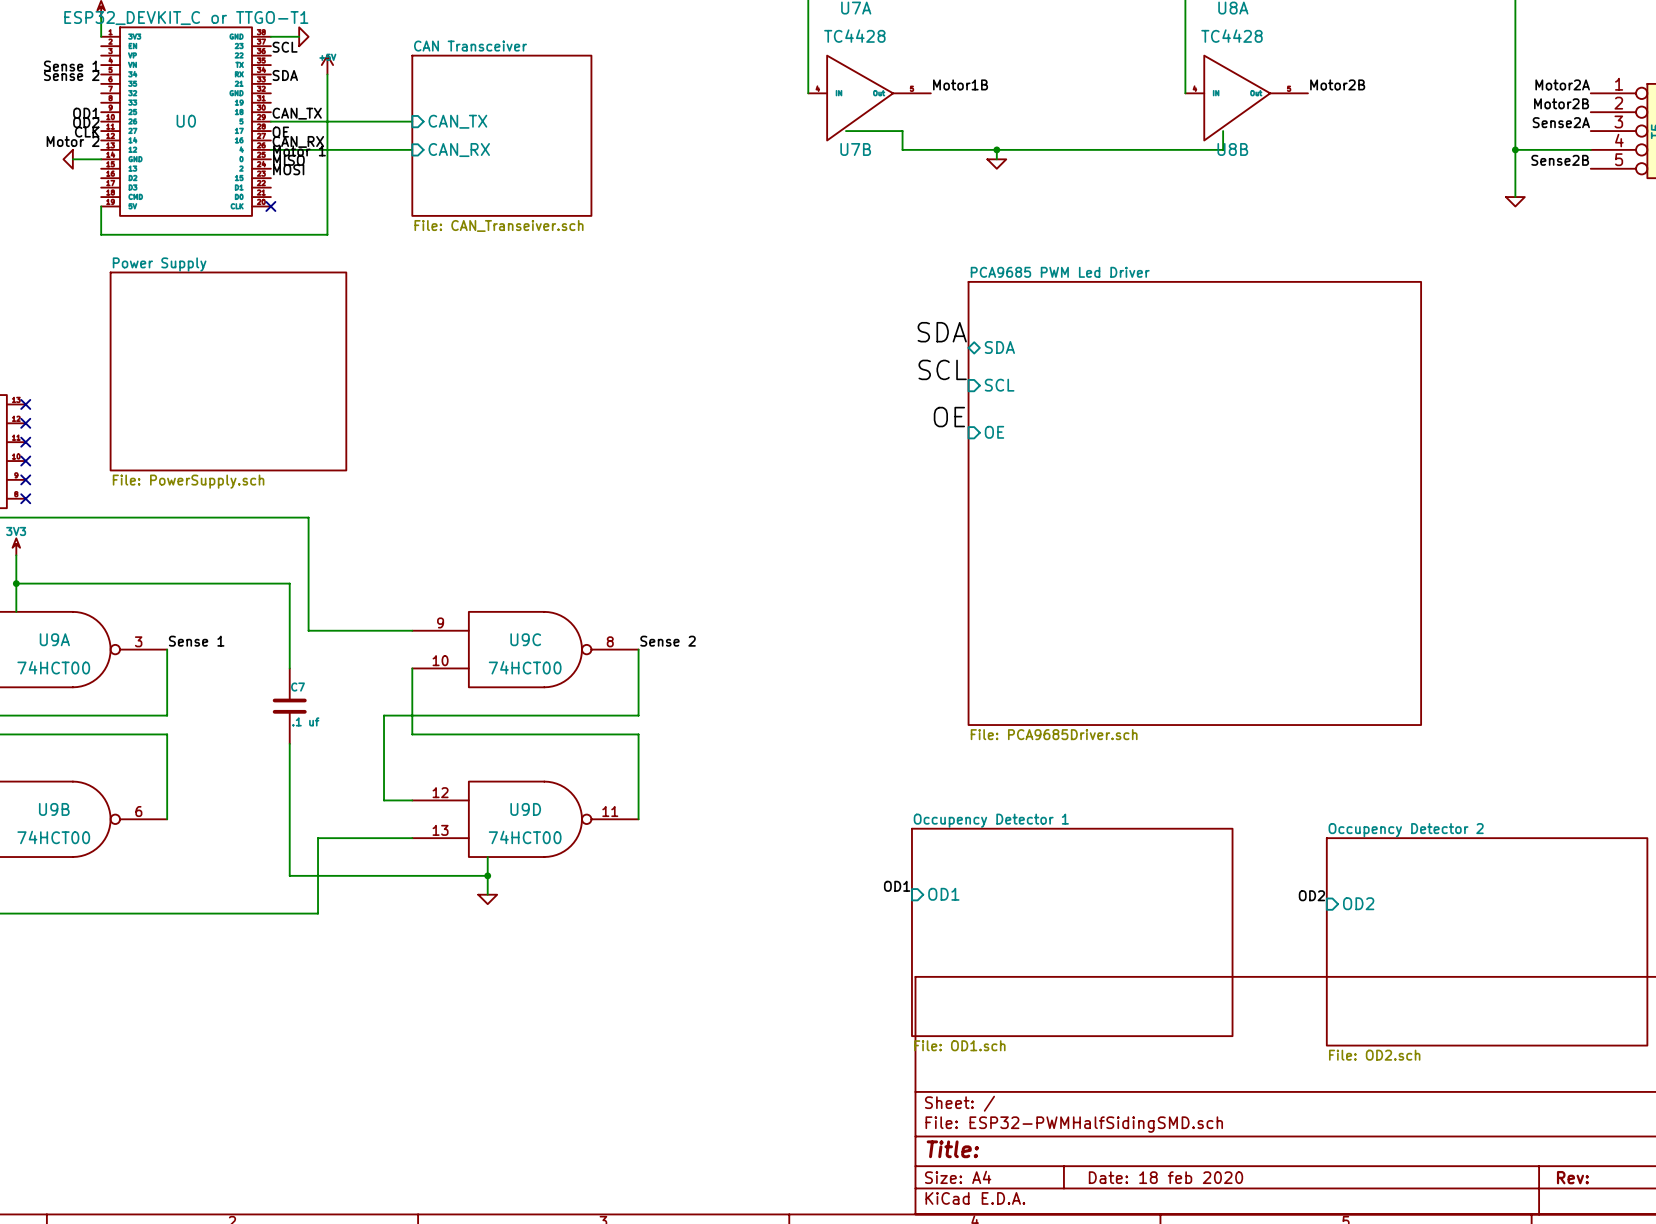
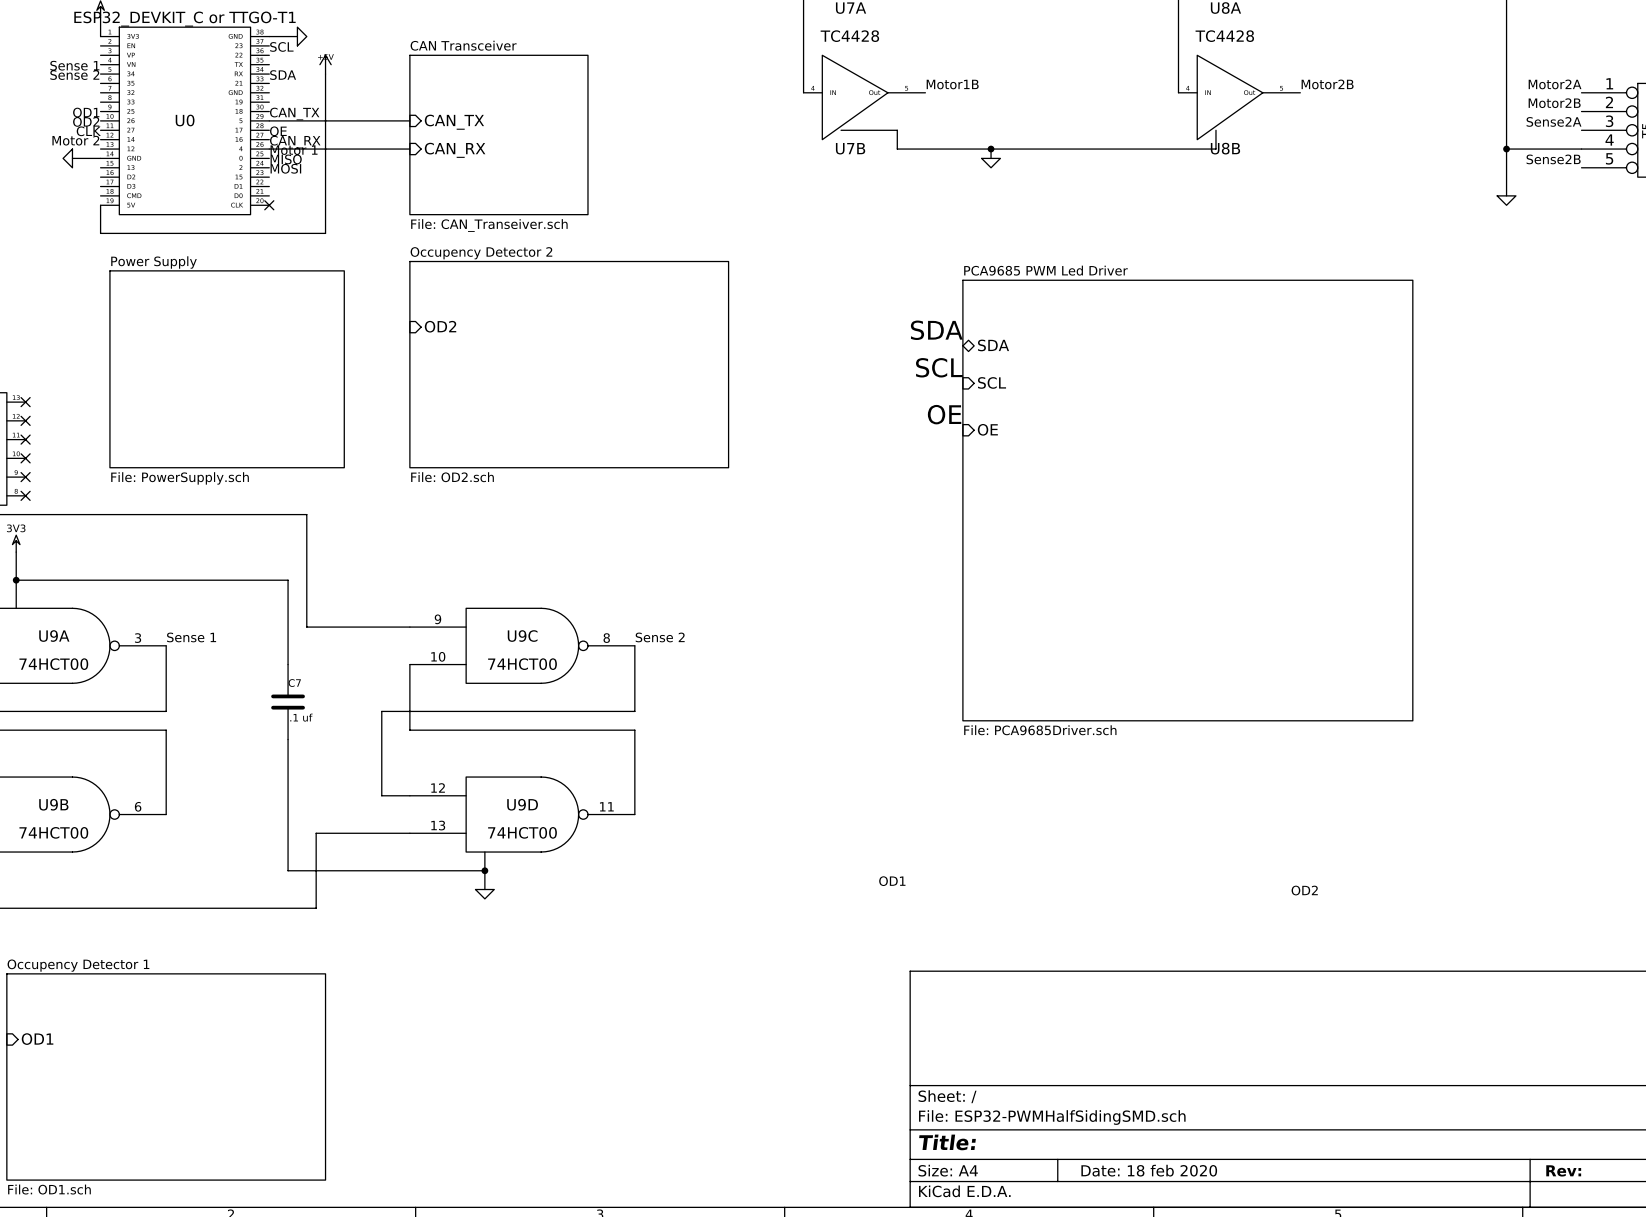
sheet pin: none -> OD2 (440, 326)
sheet pin: OD1 (943, 894) -> none
sheet pin: OD2 (1358, 903) -> none
sheet Occupency Detector 1 position: (1072, 932) -> (166, 1076)
sheet Occupency Detector 2 position: (1487, 941) -> (569, 364)
sheet pin: none -> OD1 (37, 1039)

